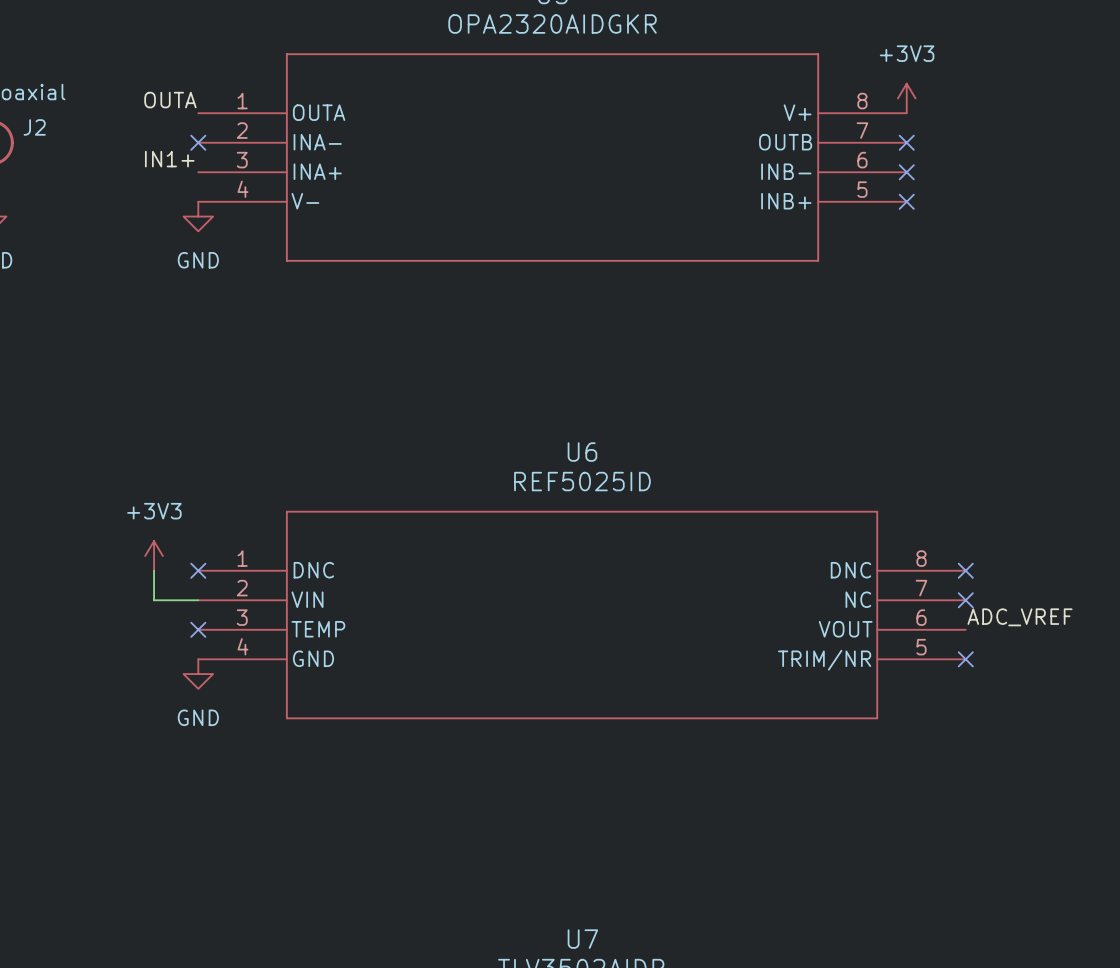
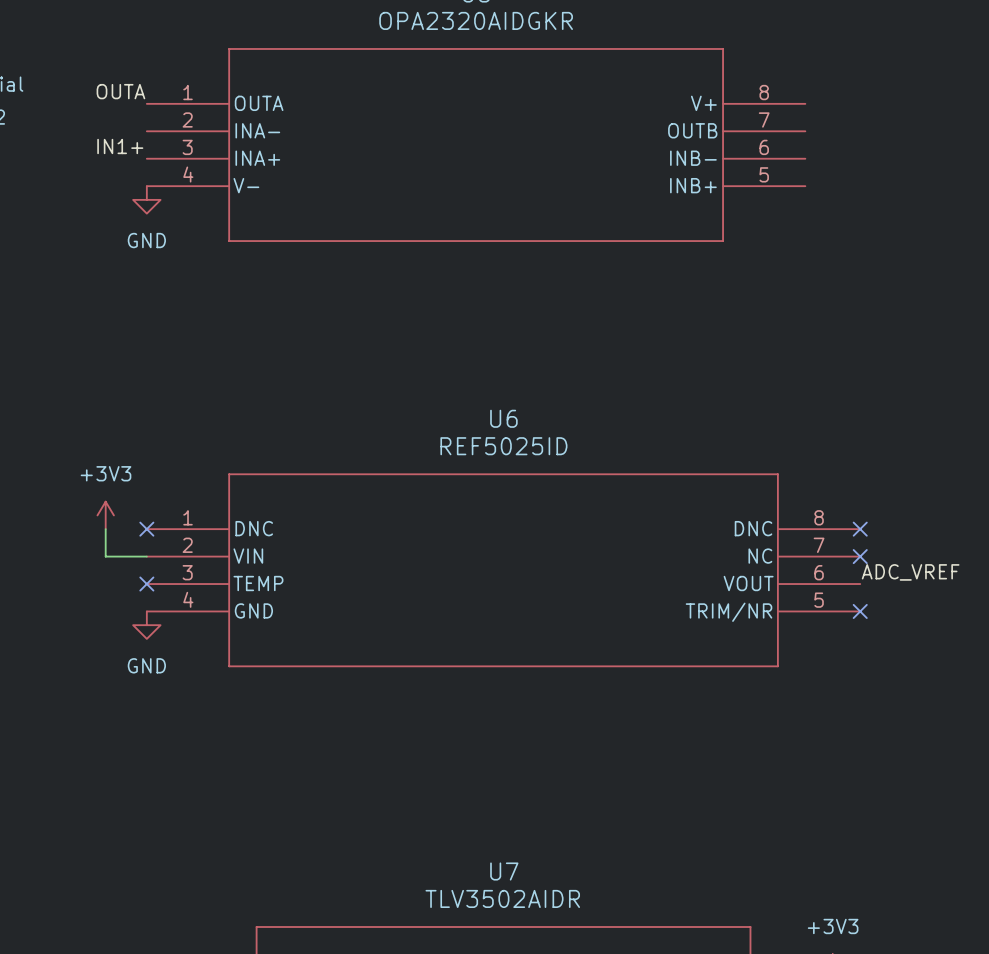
power symbol: +3V3 (906, 98) -> none
no-connect mark: (198, 142) -> none
no-connect mark: (906, 142) -> none
no-connect mark: (906, 172) -> none
no-connect mark: (906, 201) -> none

